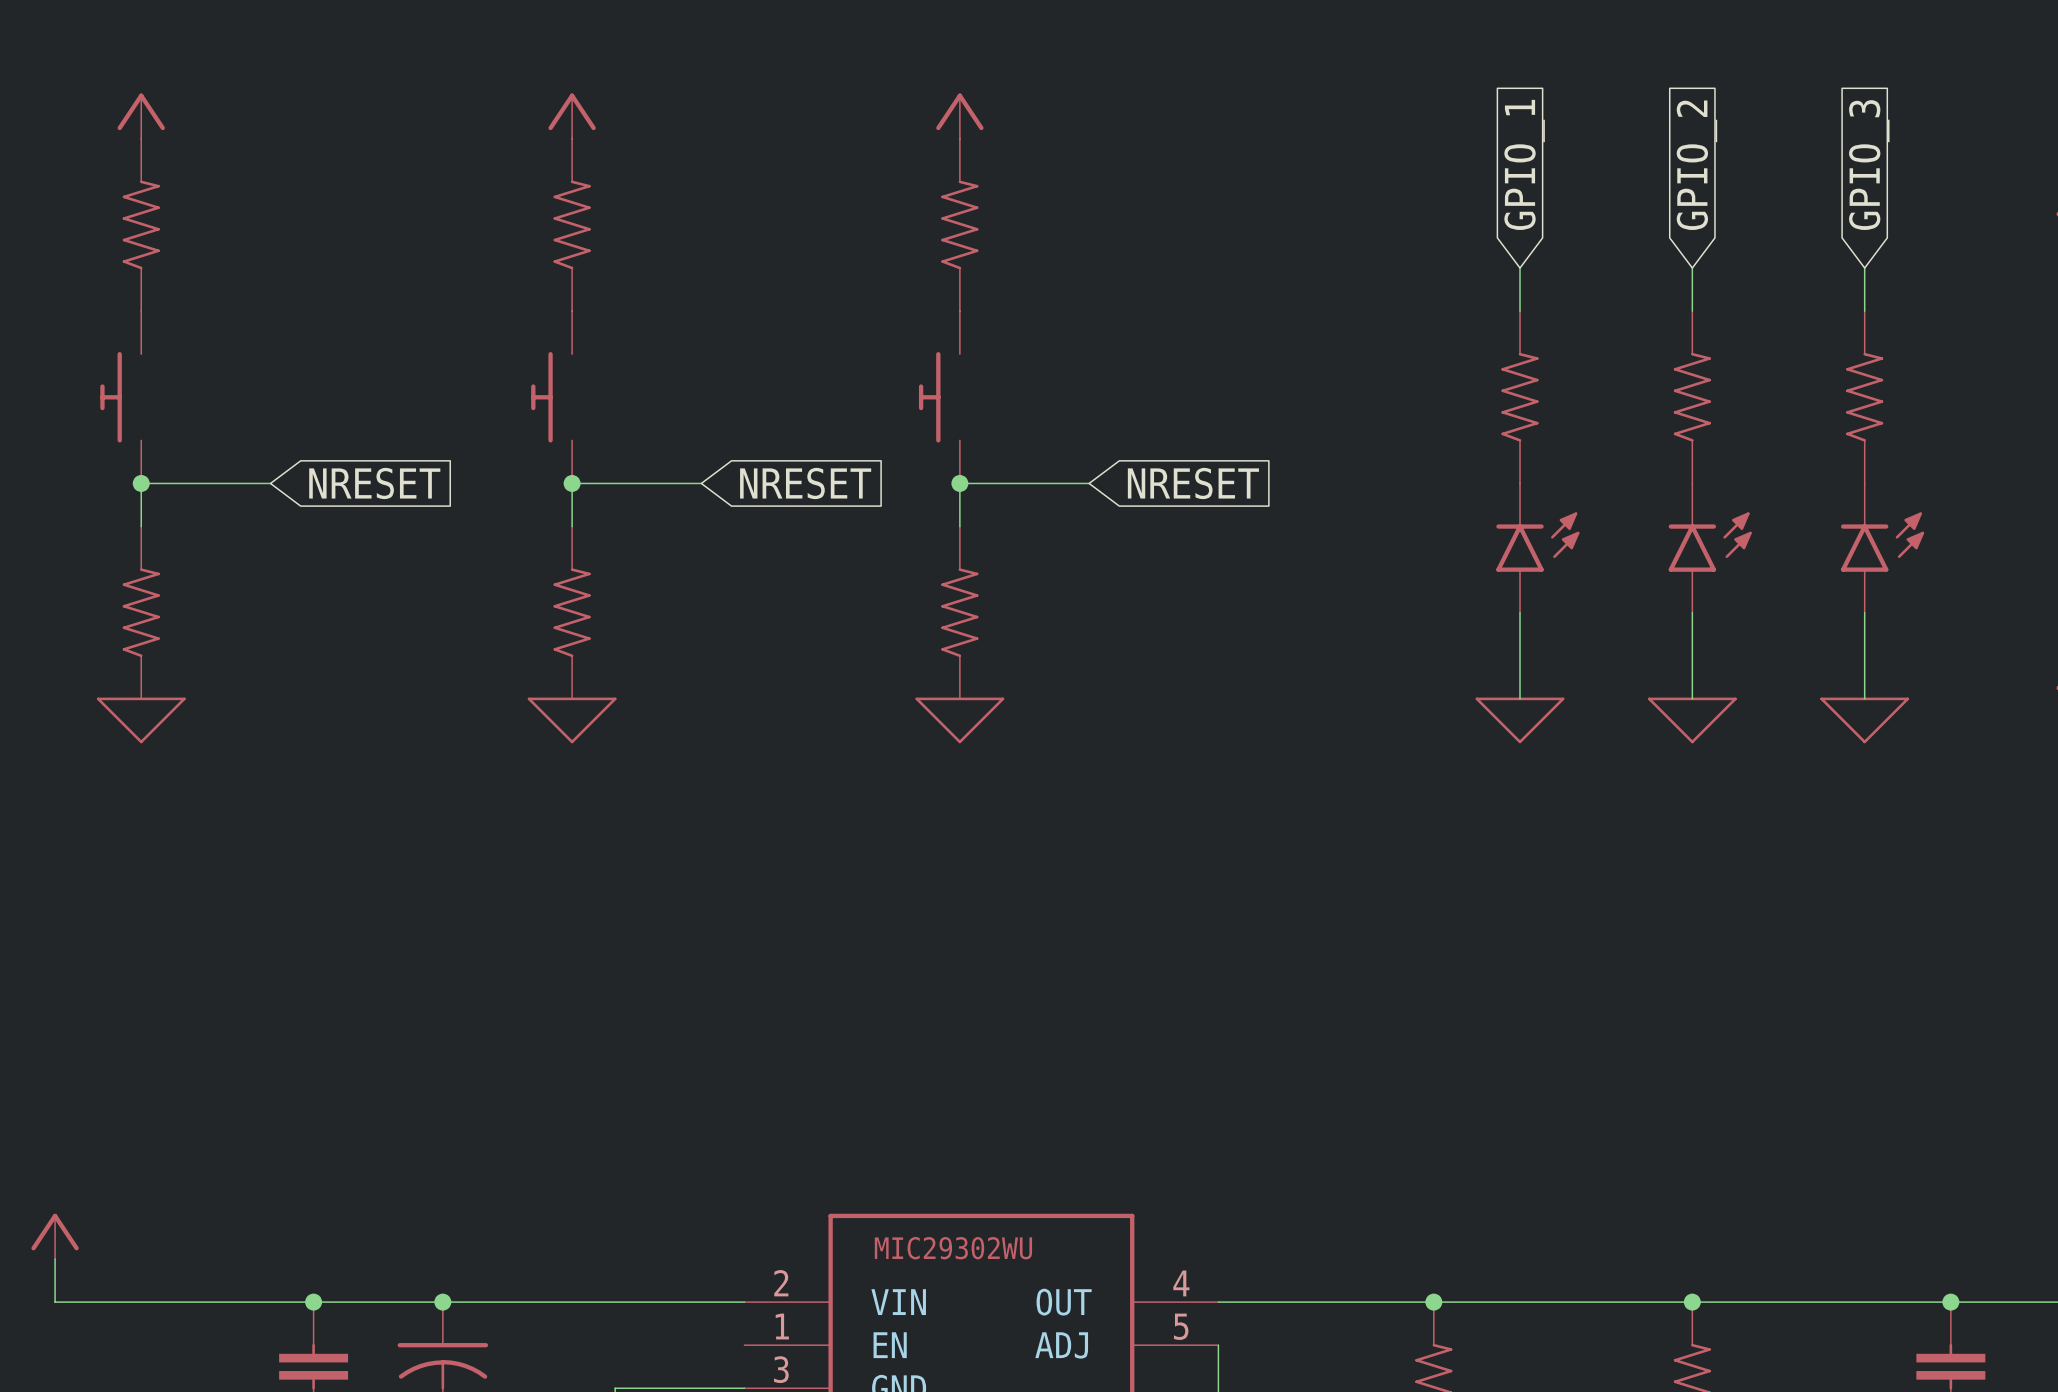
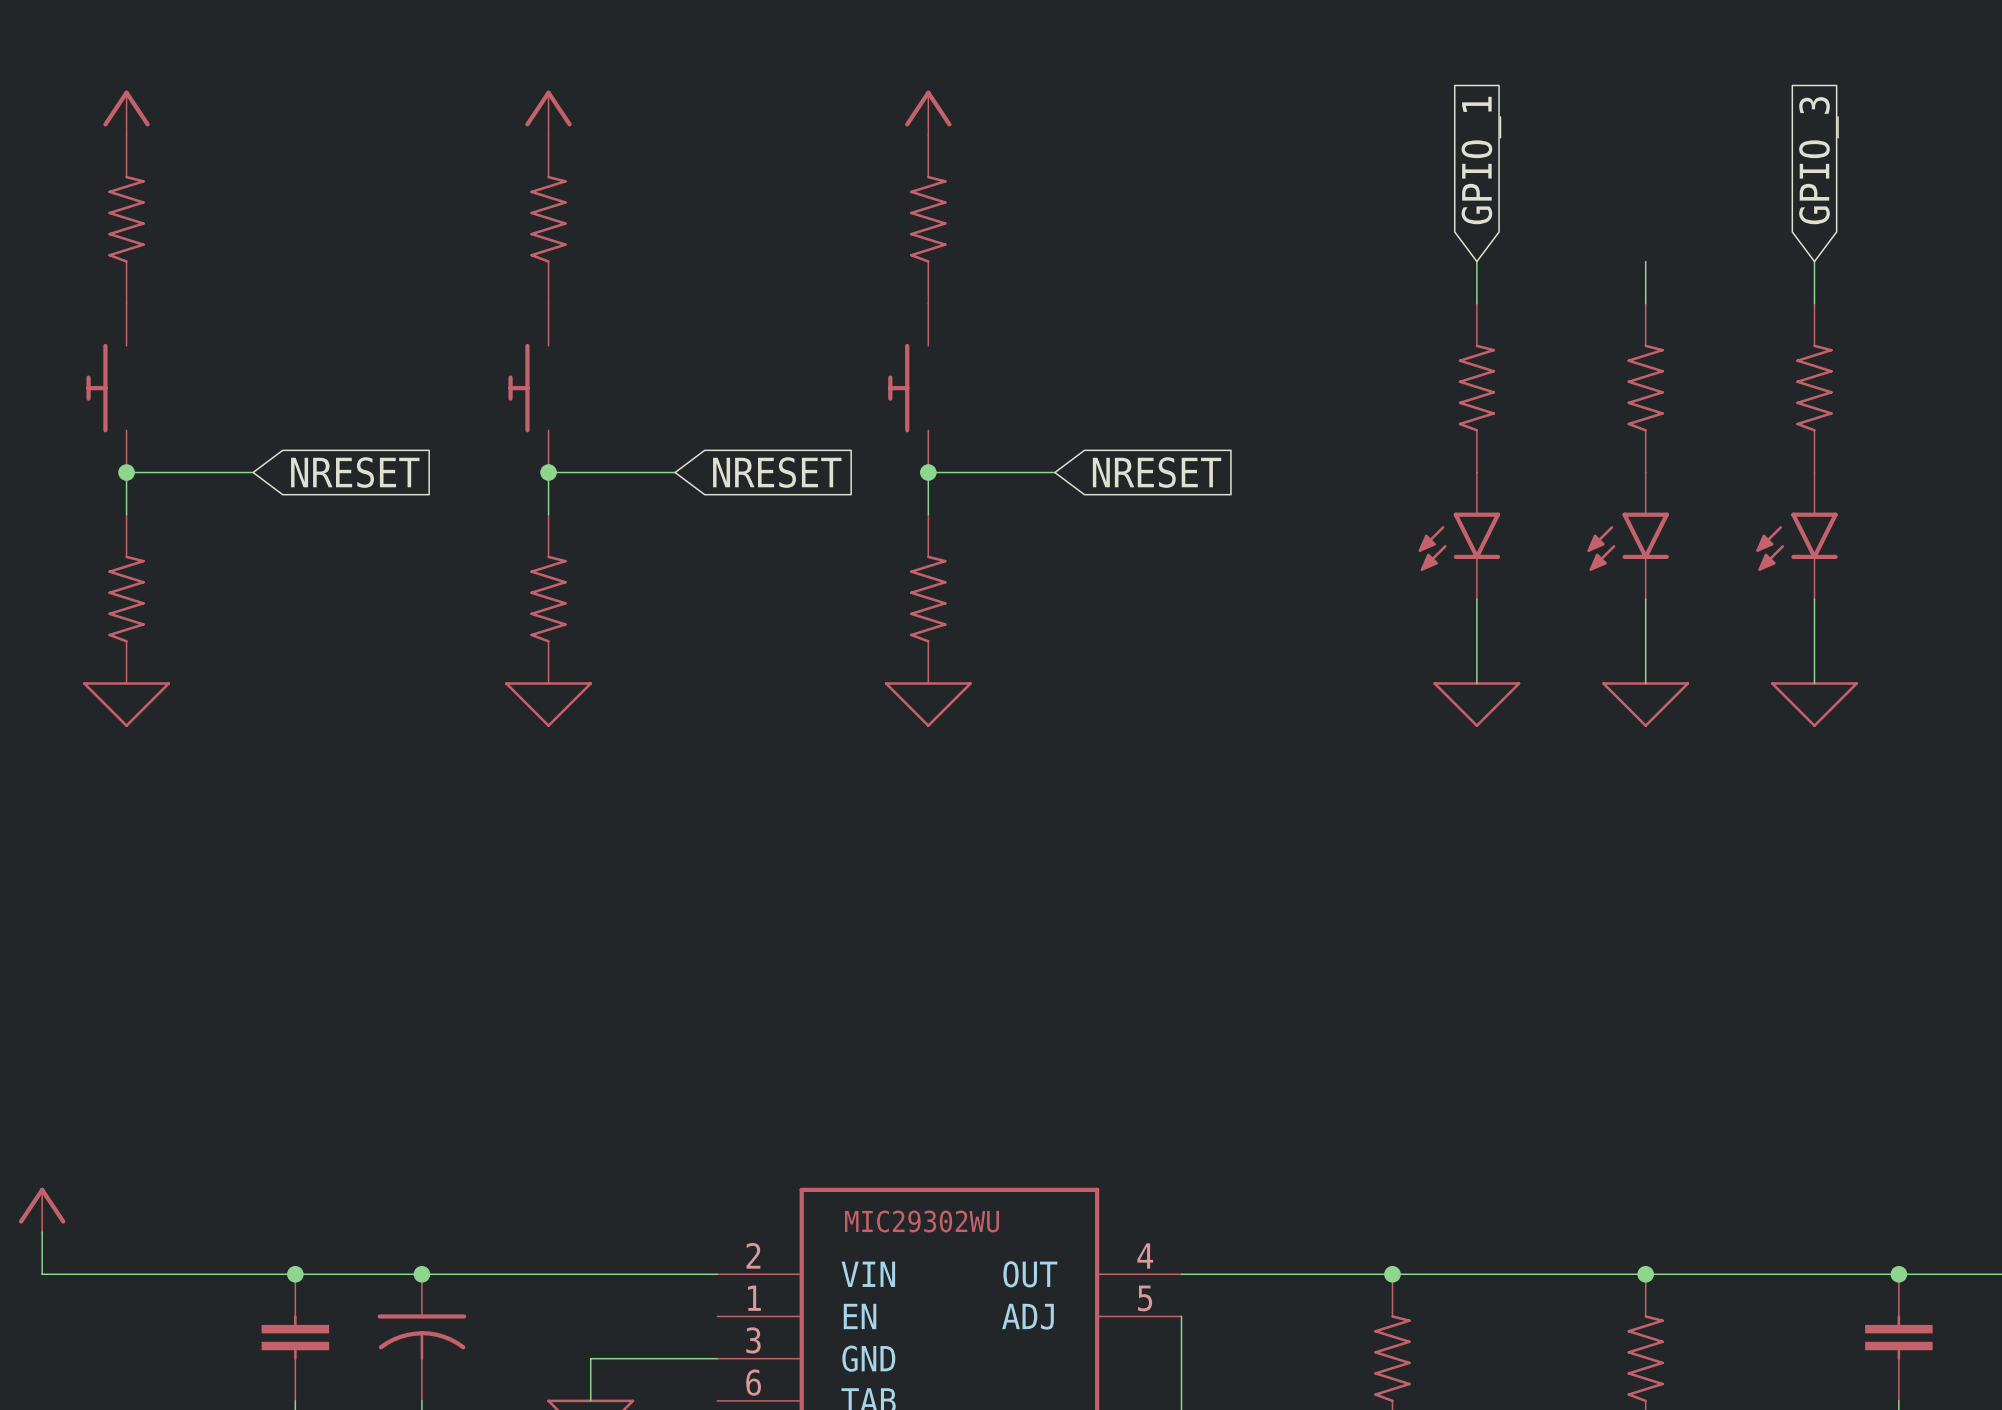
global label: GPIO_2 (1696, 165) -> none
part rotation: 0° (1537, 542) -> 180° (1459, 541)
part rotation: 0° (1710, 542) -> 180° (1628, 541)
part rotation: 0° (1882, 542) -> 180° (1796, 541)

